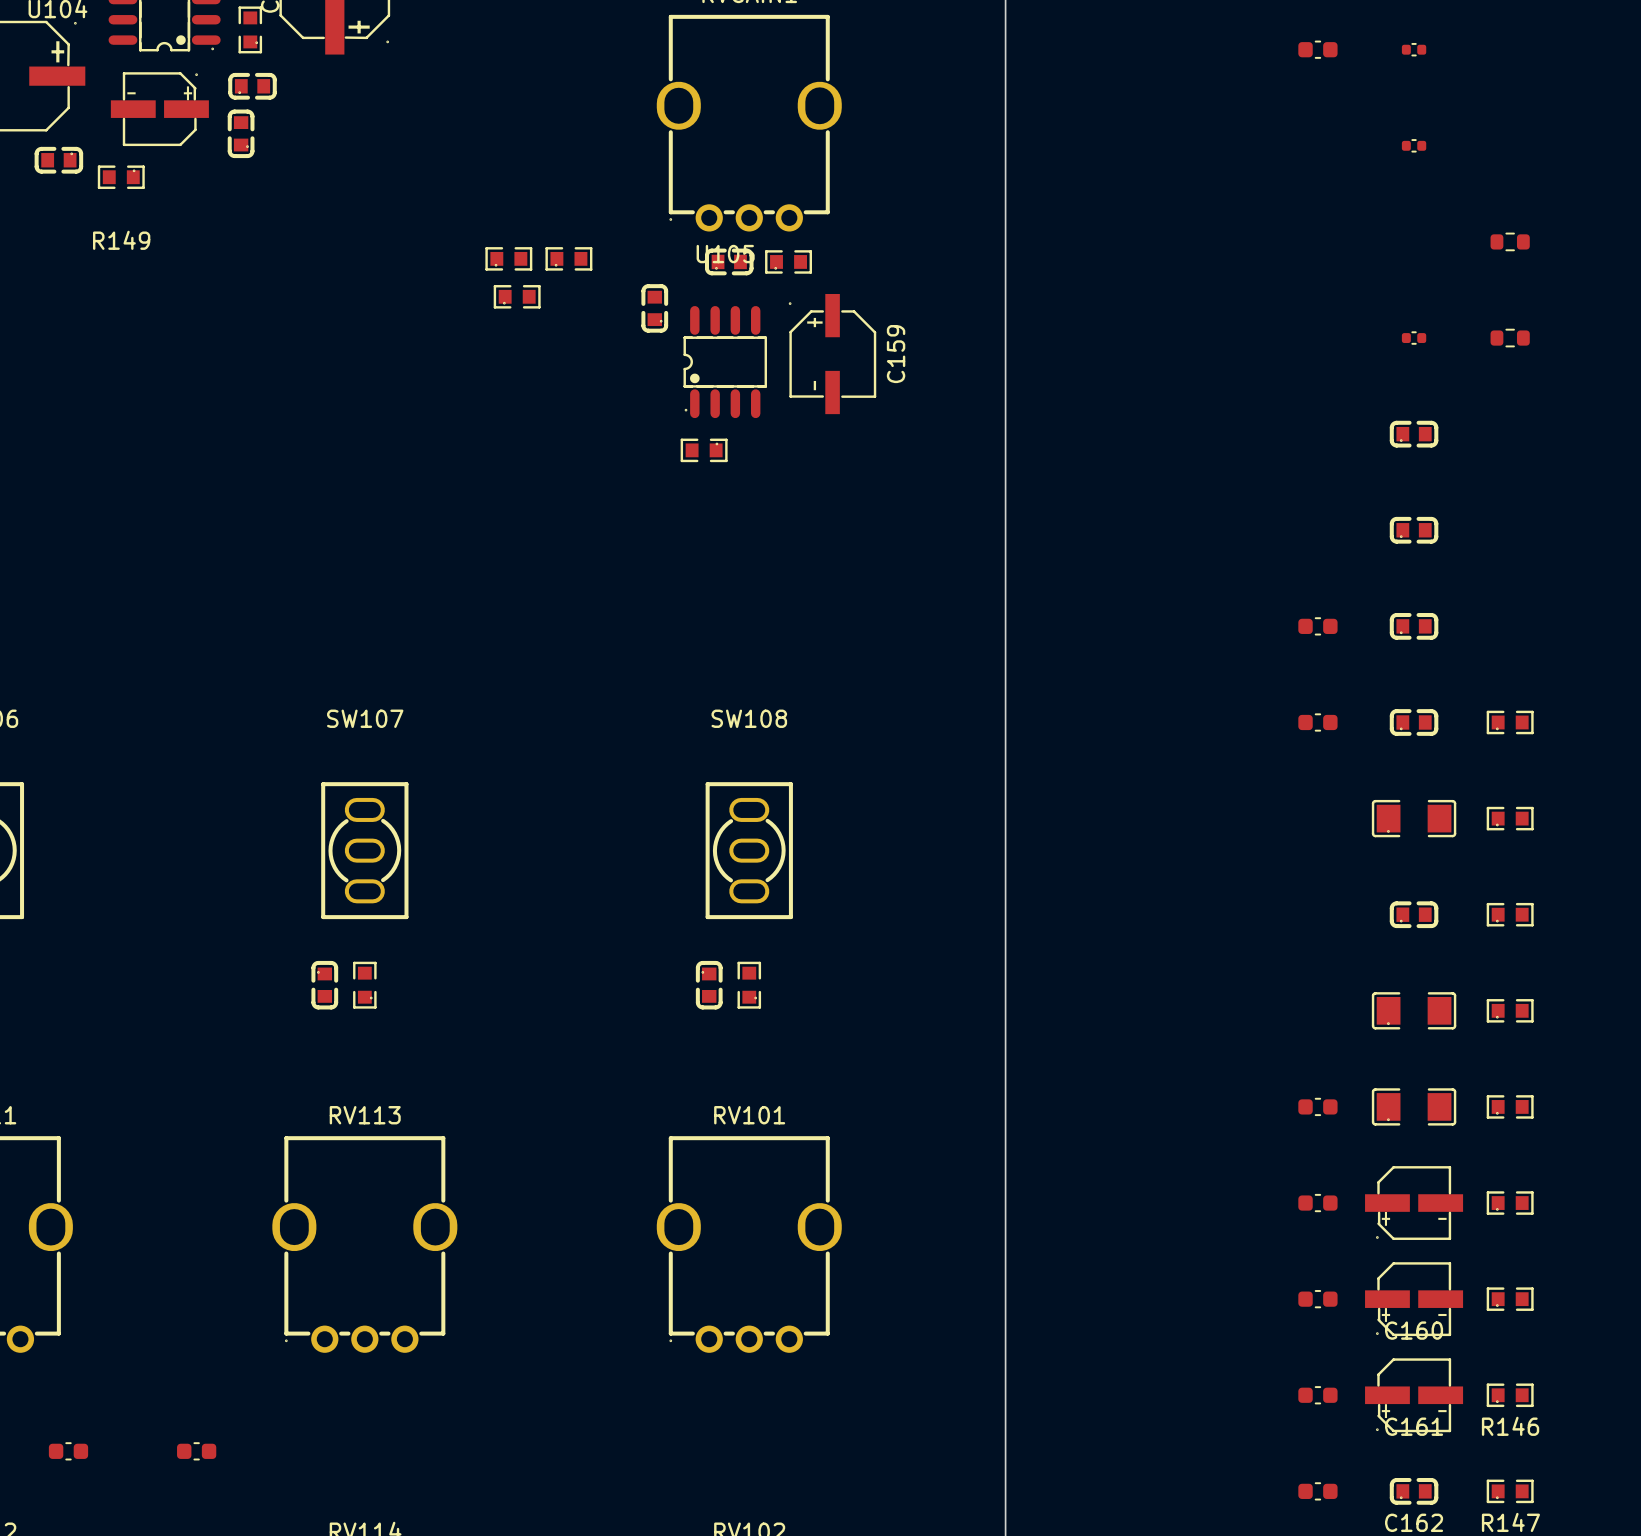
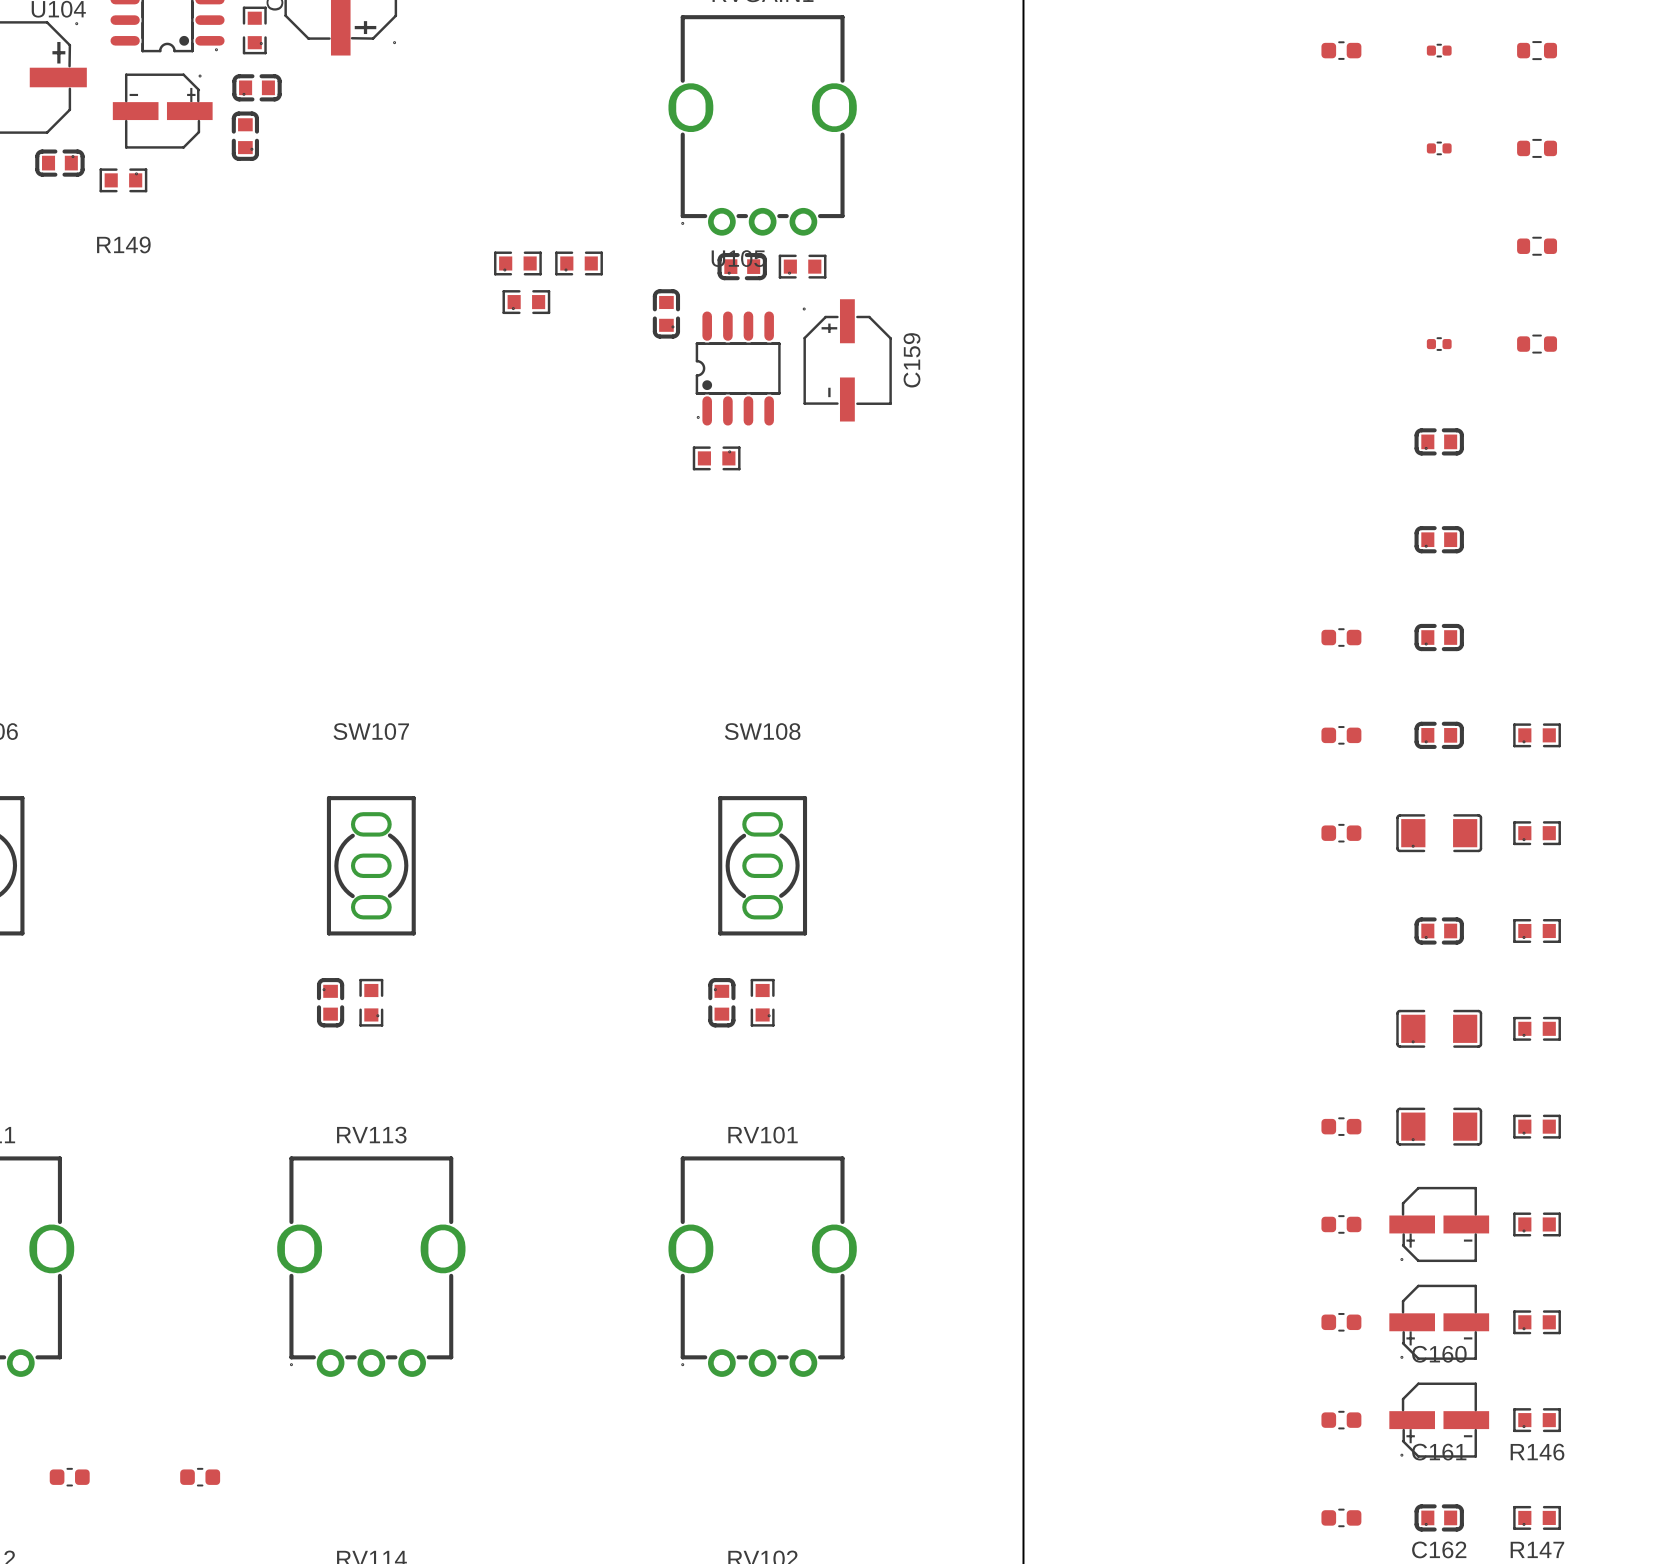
part: none -> (1537, 50)
part: none -> (1537, 148)
part: none -> (1341, 833)

